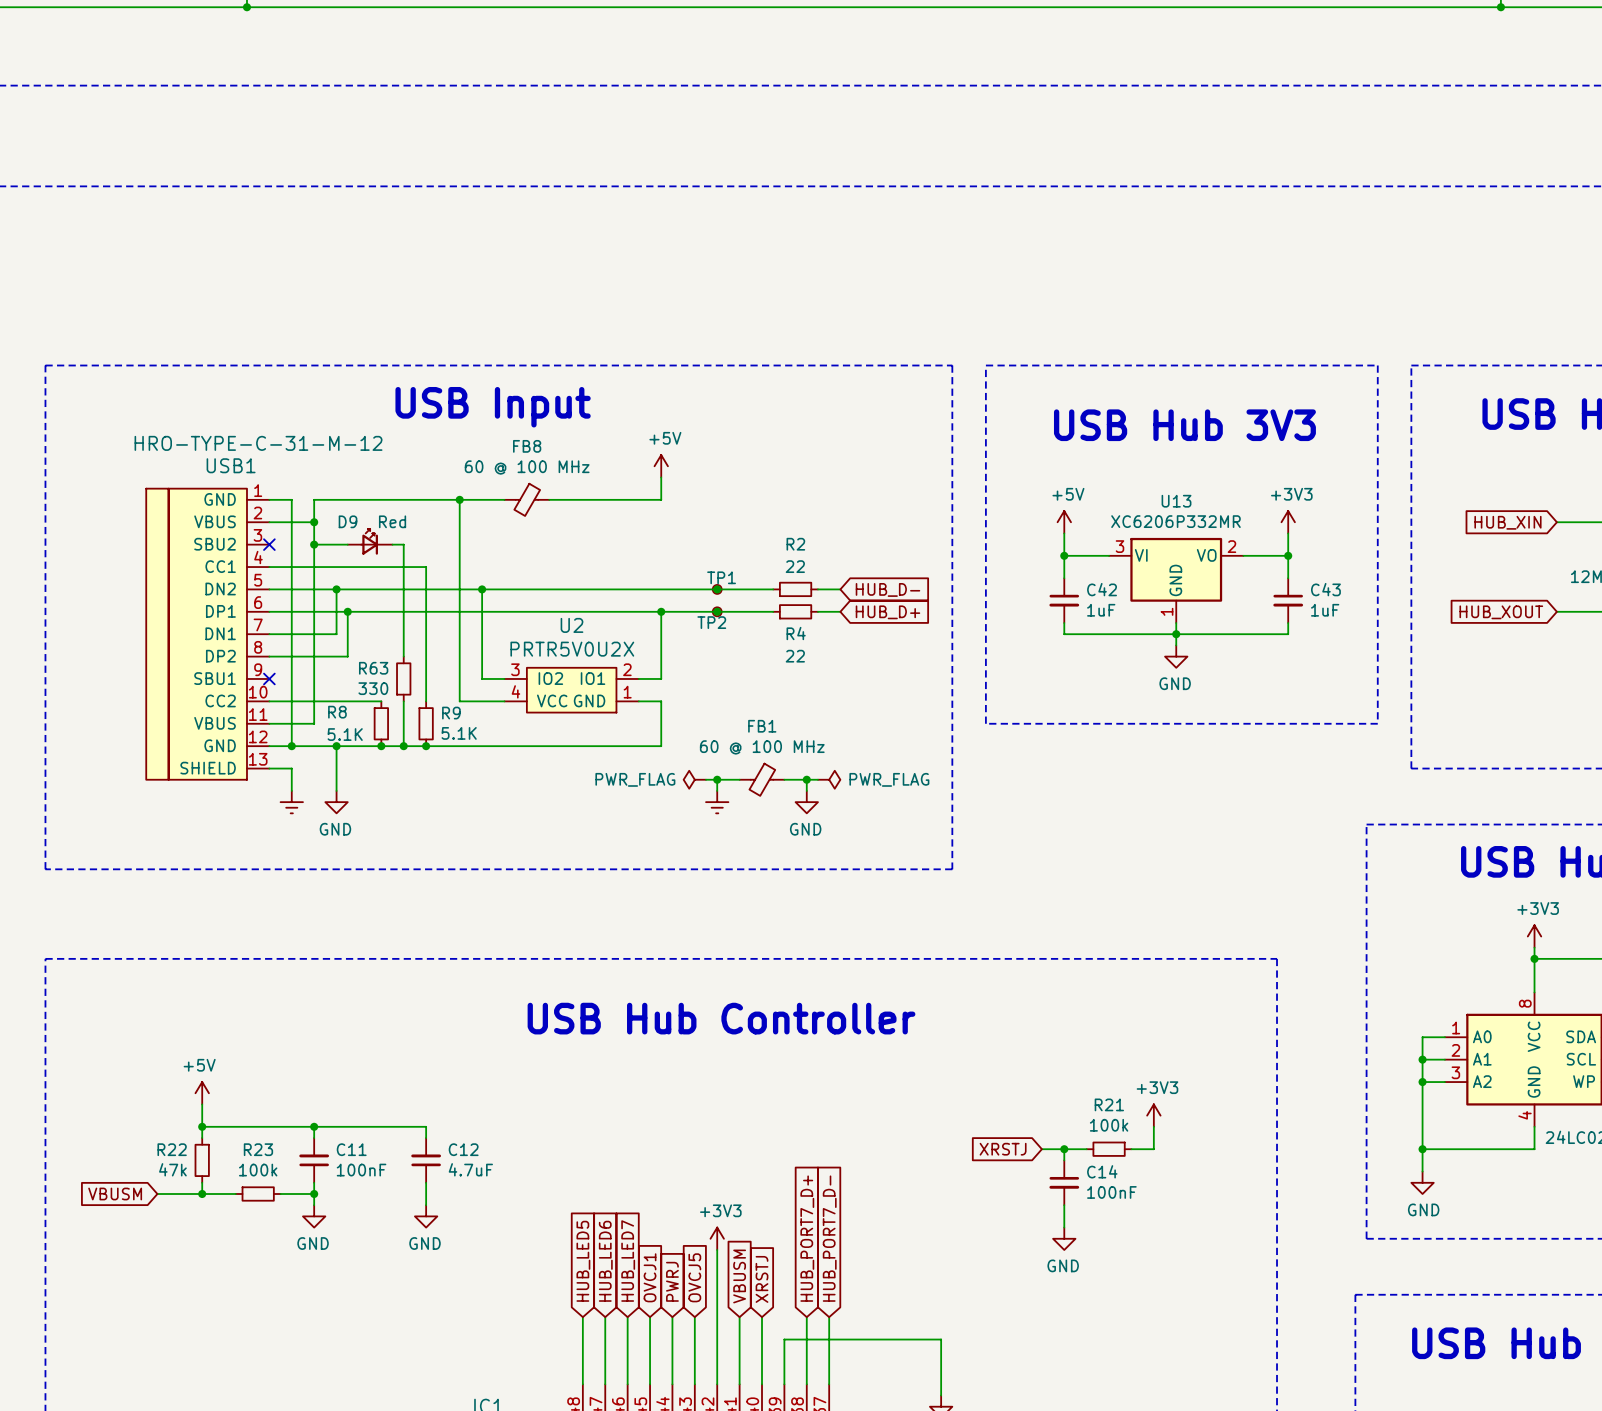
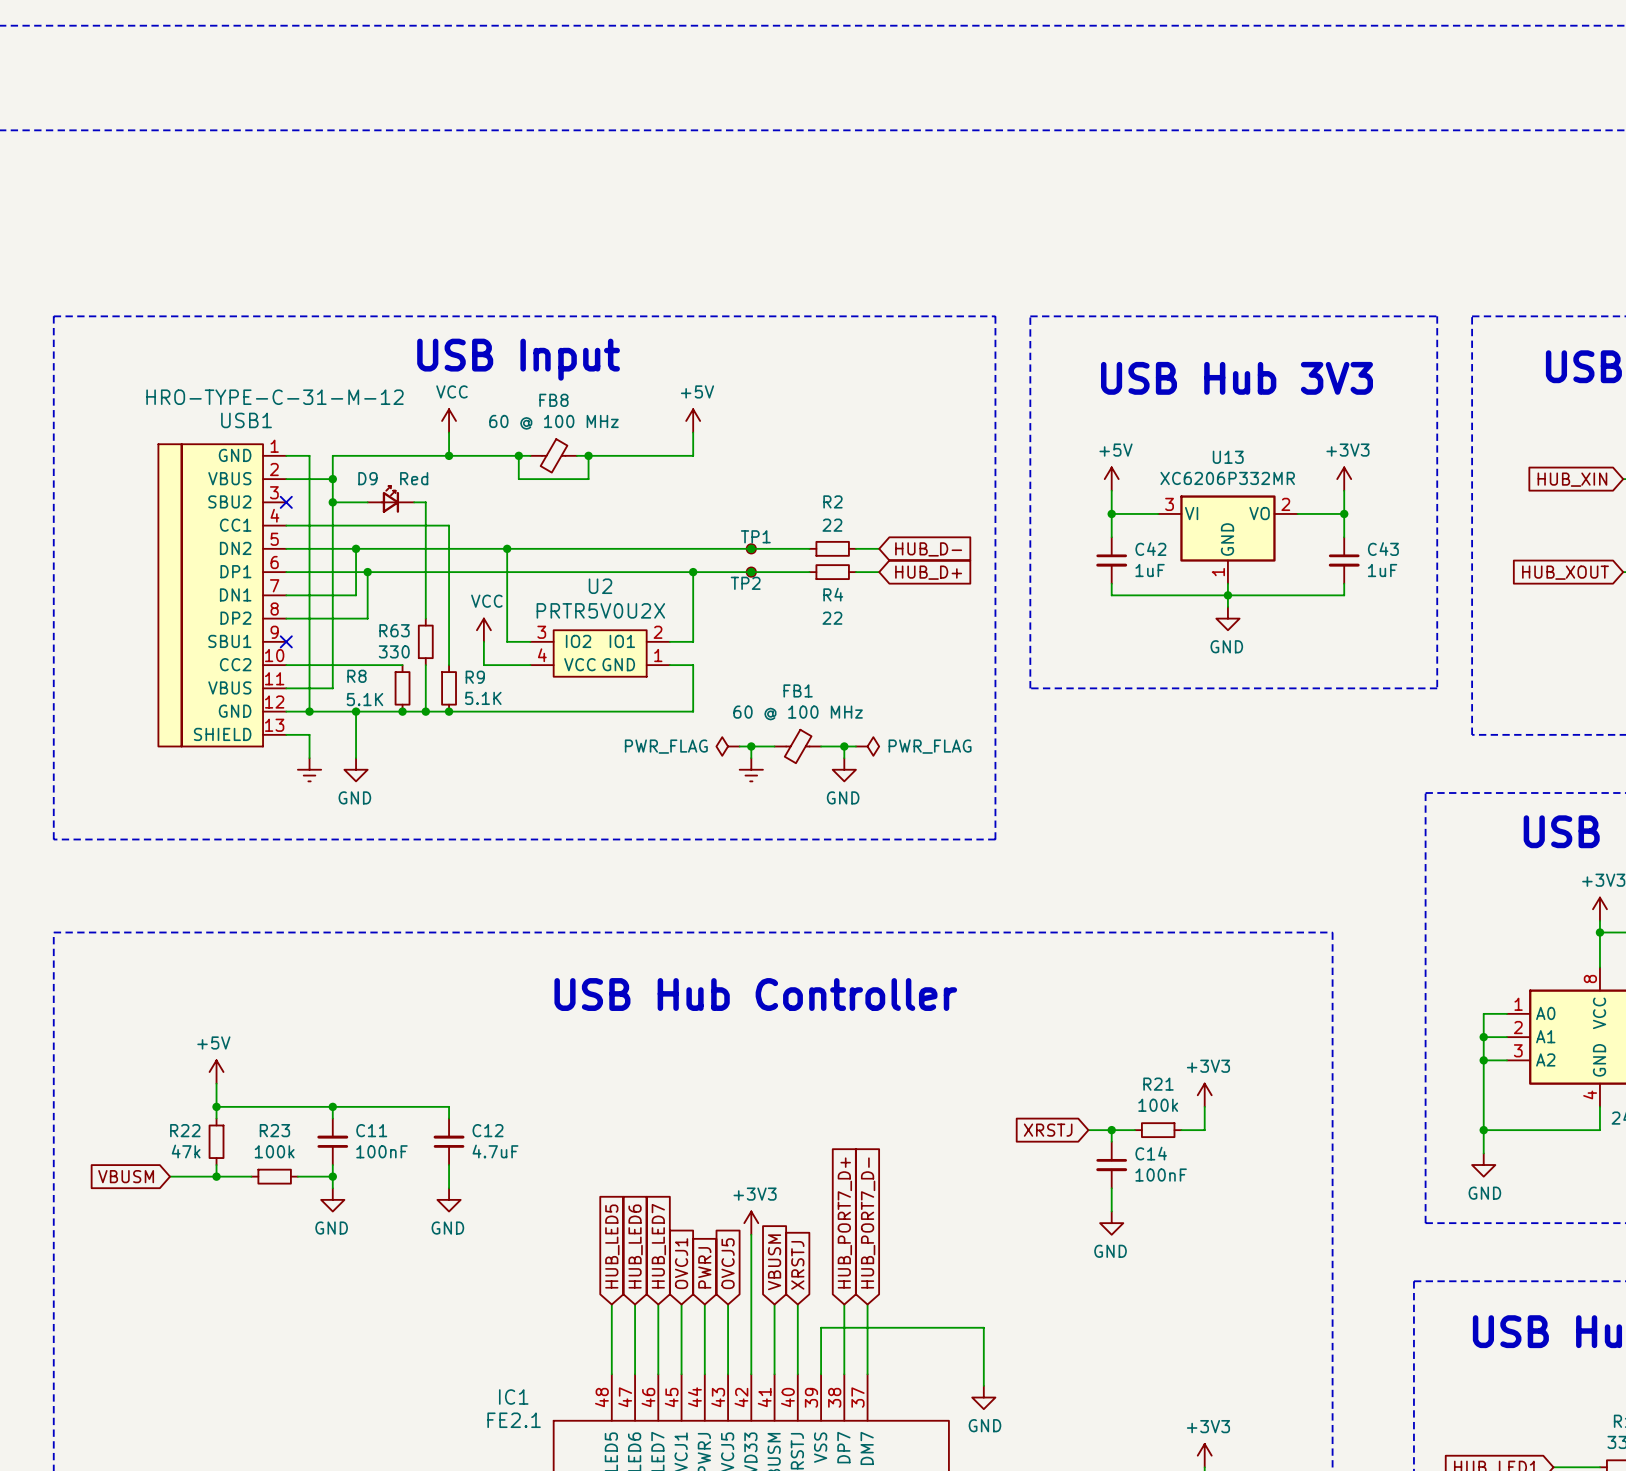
power symbol: none -> VCC (449, 420)
wire: none -> (449, 432) (449, 455)
junction: none -> (449, 455)
wire: (459, 499) (459, 678) -> none
junction: (459, 499) -> none
wire: none -> (518, 455) (518, 479) (588, 479) (588, 455)
junction: none -> (518, 455)
junction: none -> (588, 455)
power symbol: none -> VCC (483, 630)

